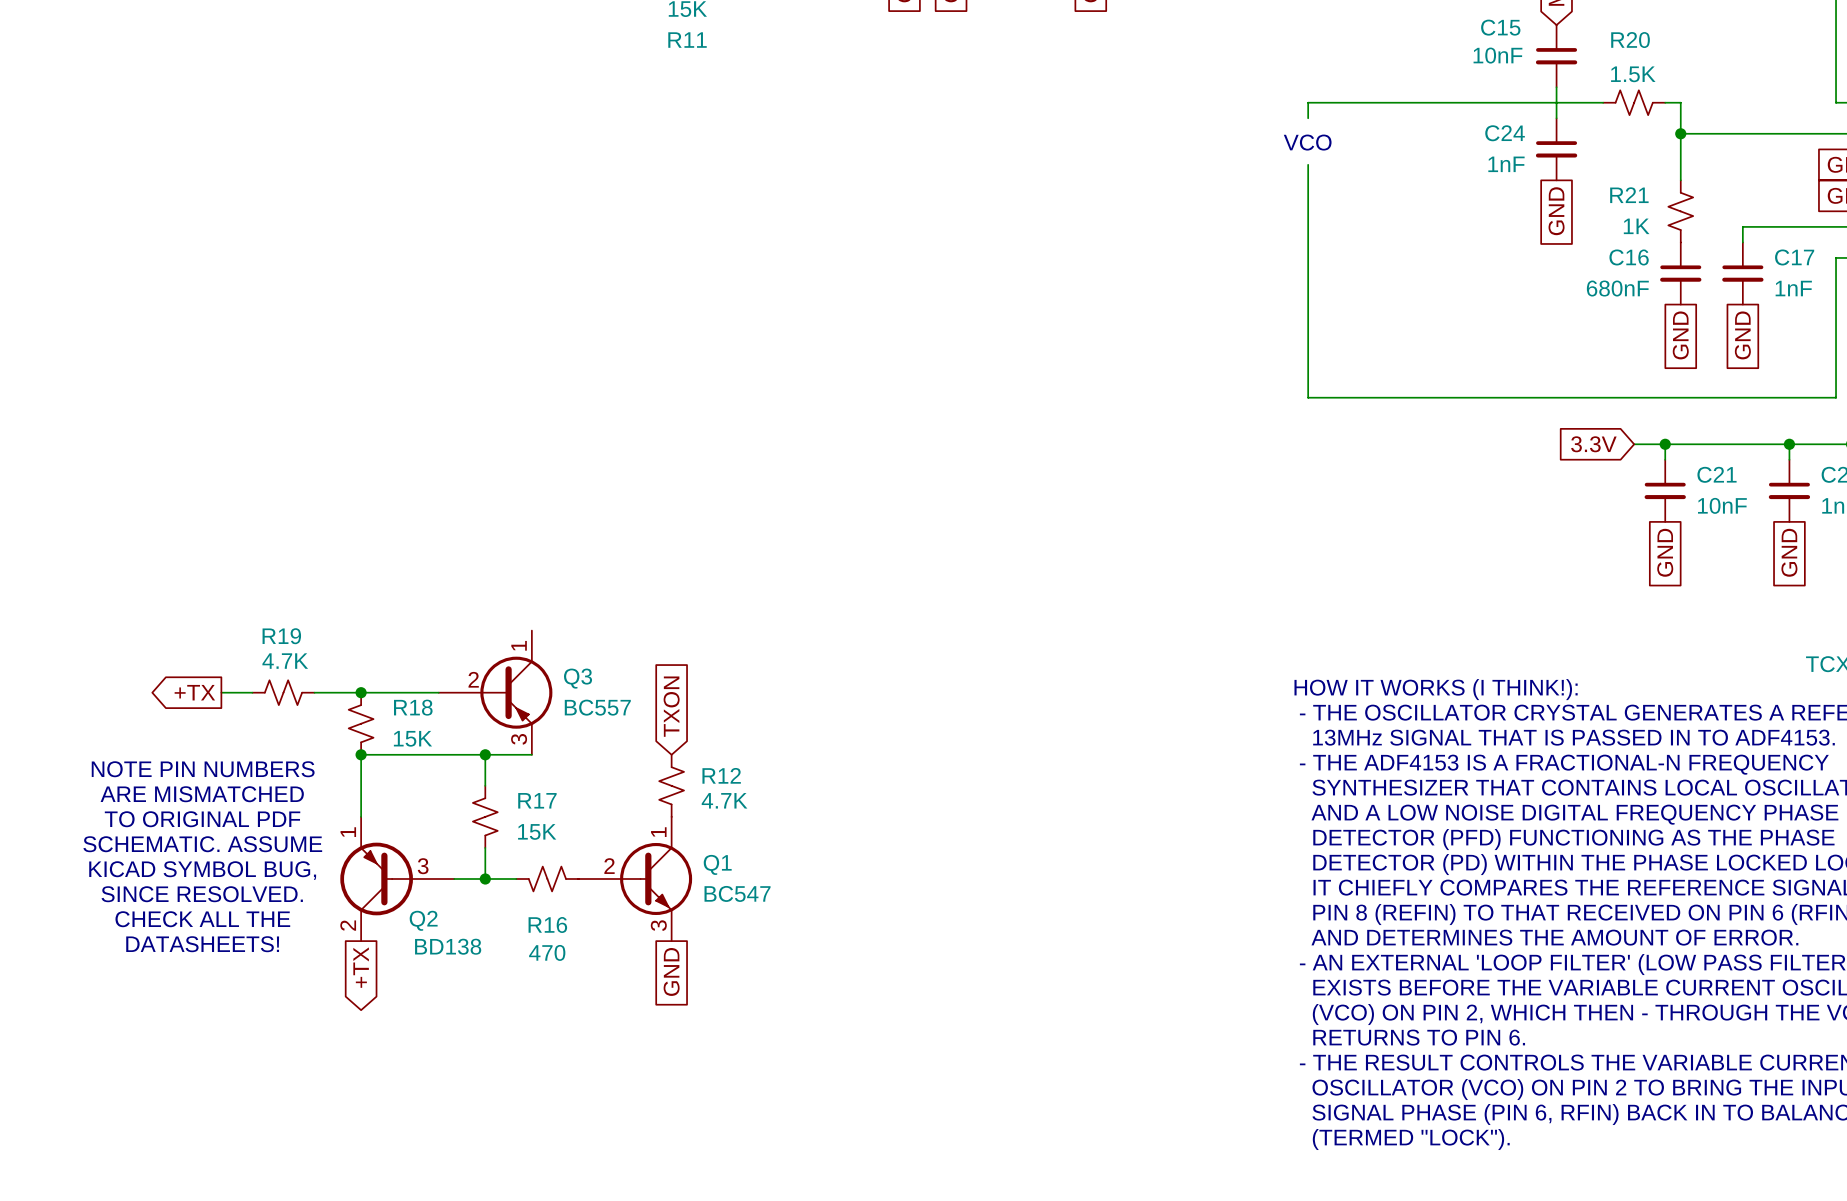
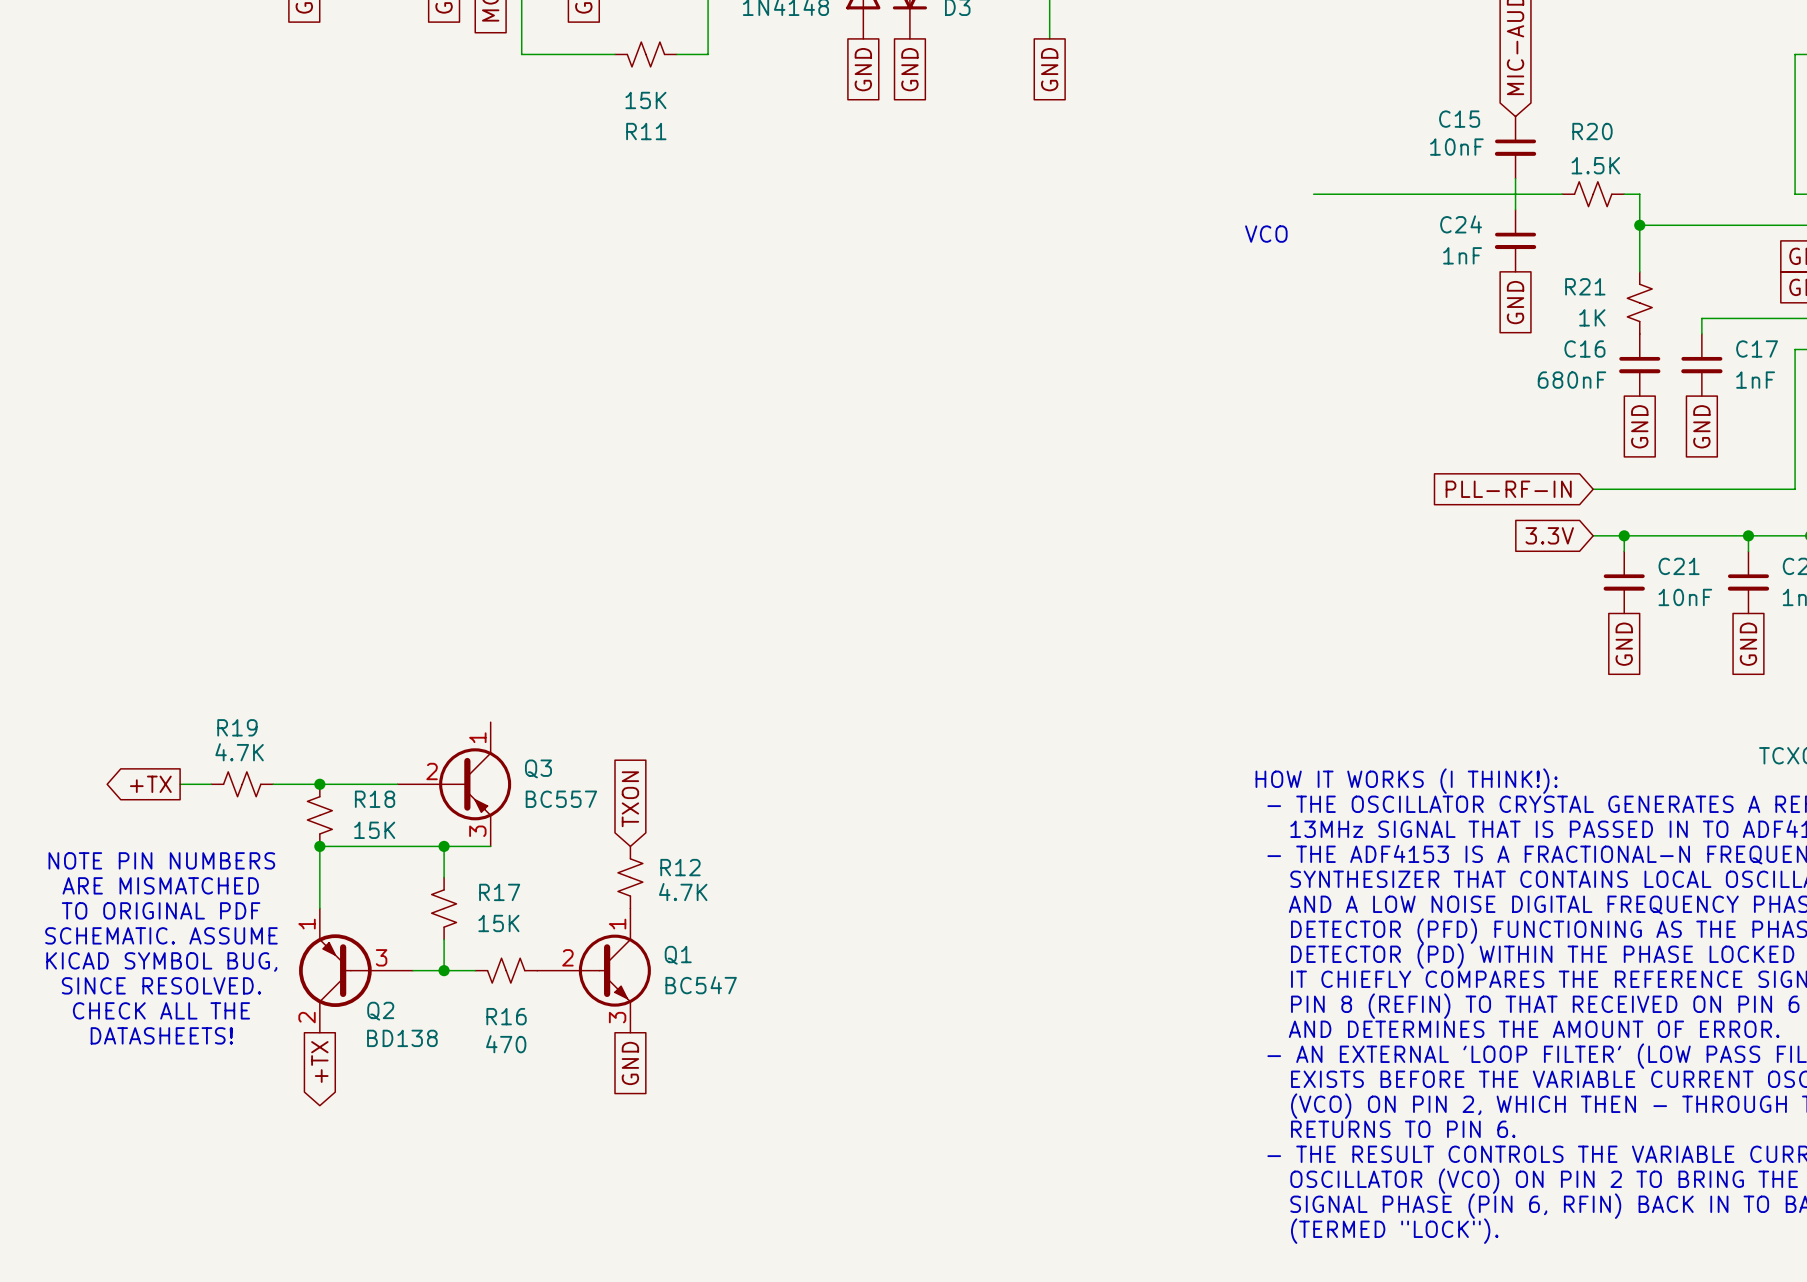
wire: (1354, 102) (1308, 102) (1308, 118) -> none
wire: (1308, 164) (1308, 397) (1634, 397) -> none
global label: none -> PLL-RF-IN (1508, 489)

